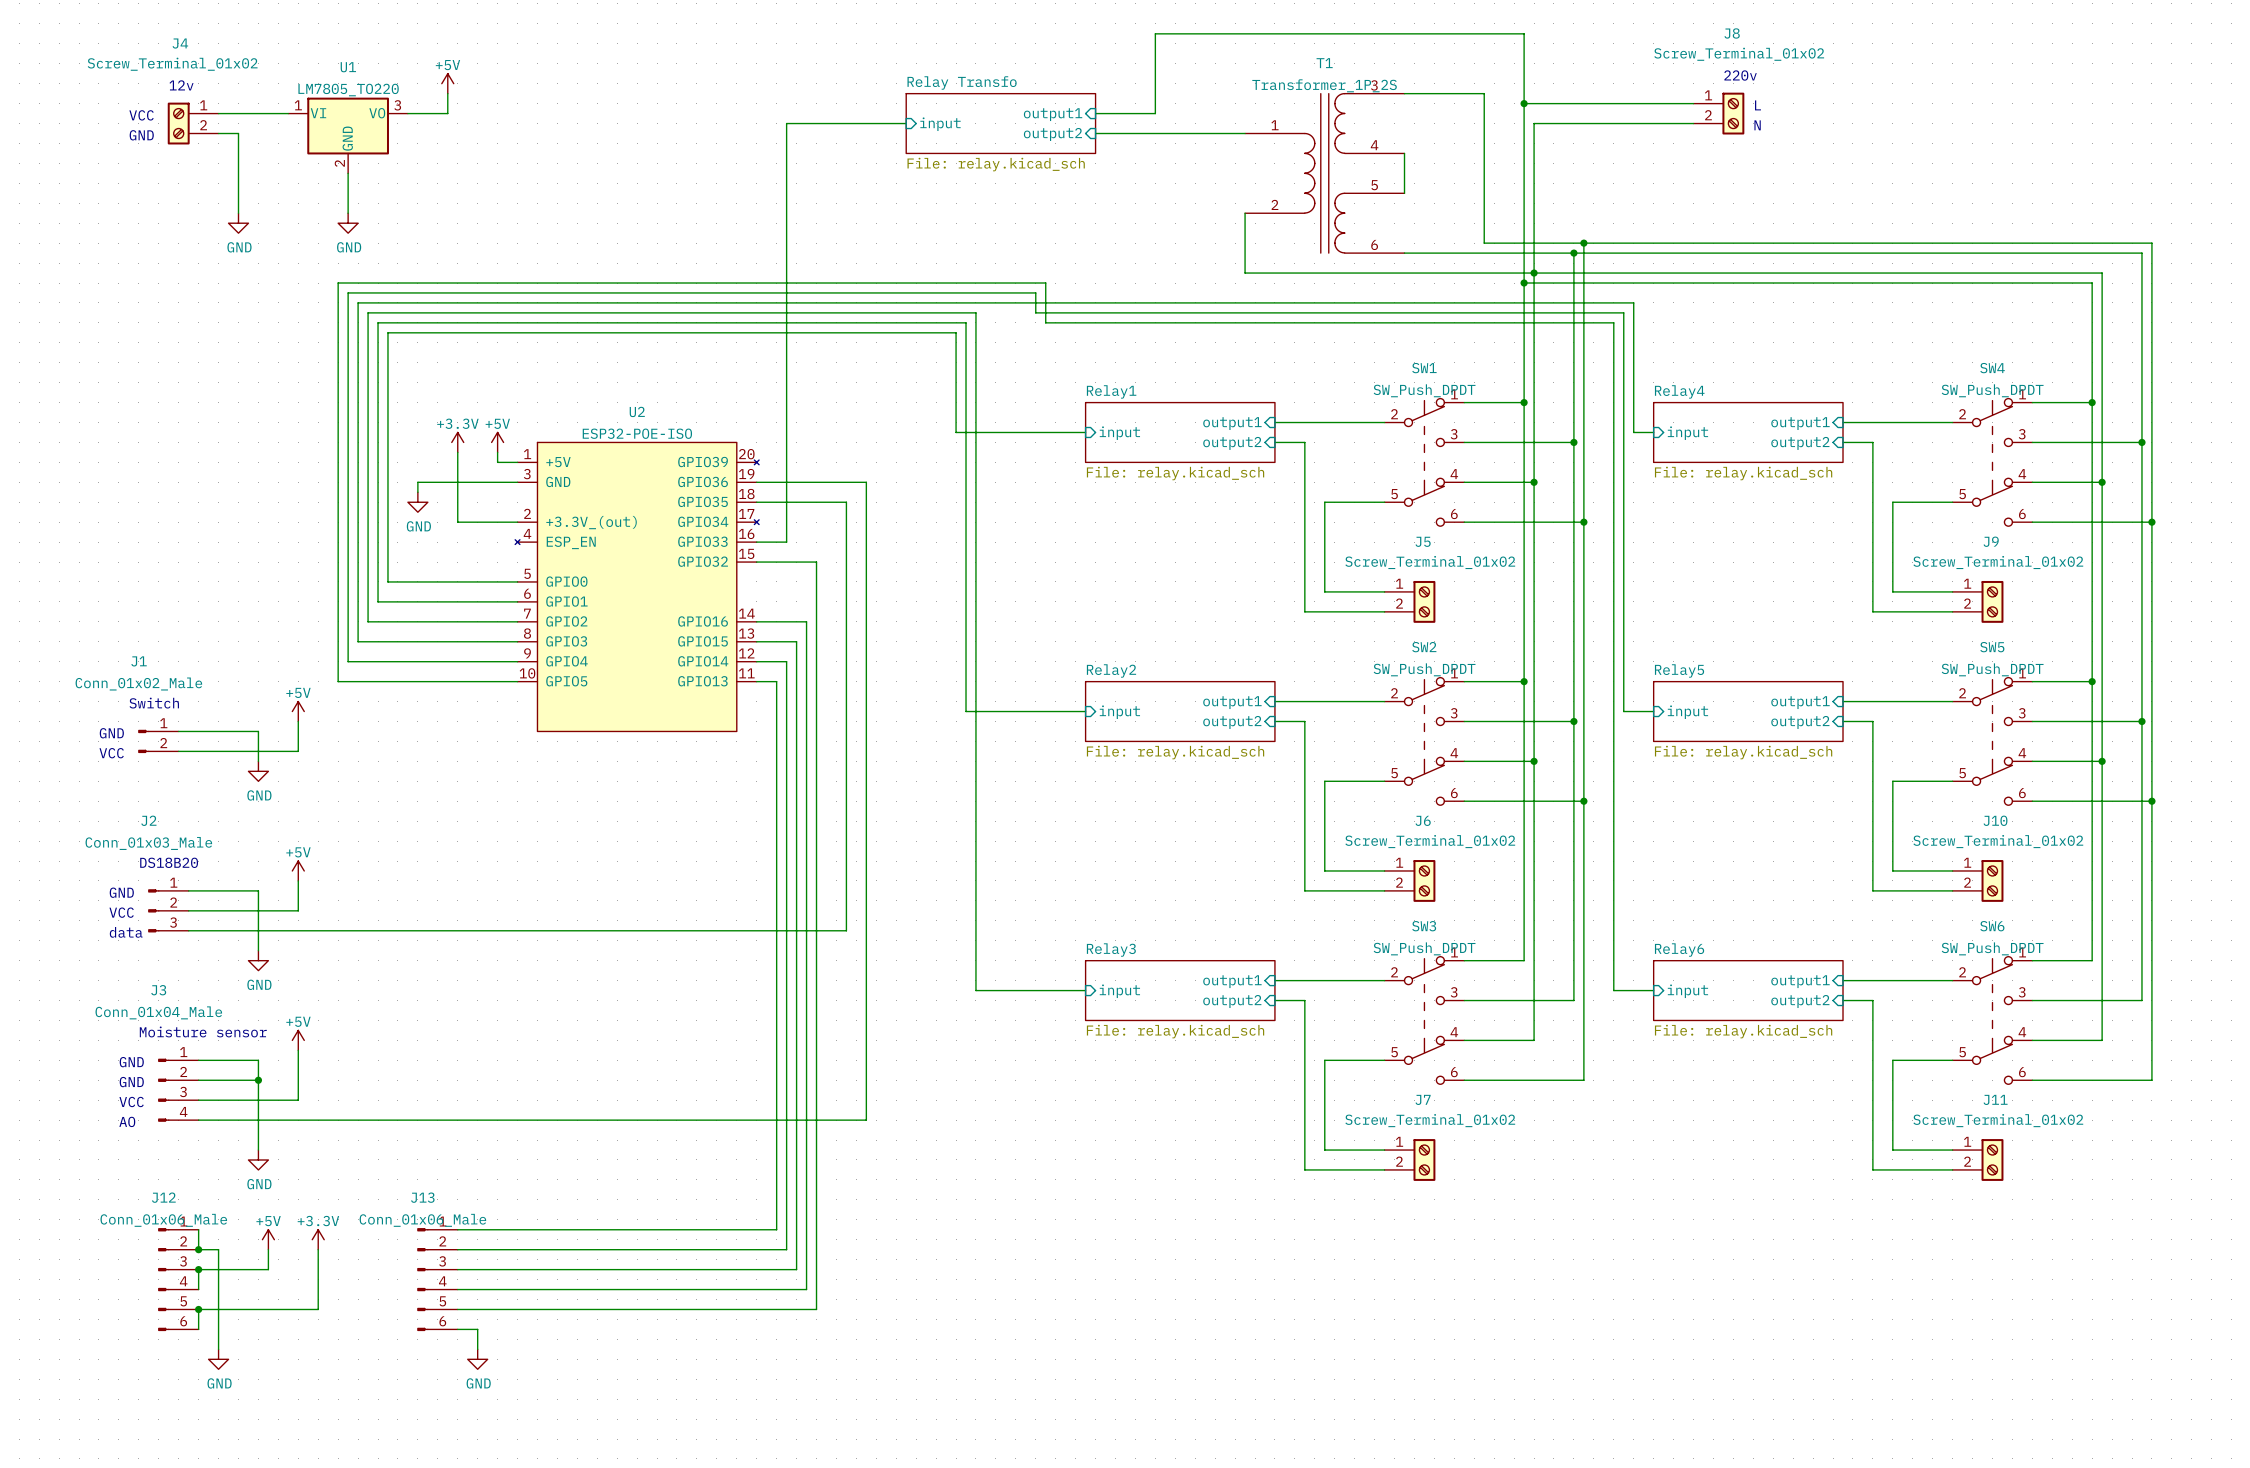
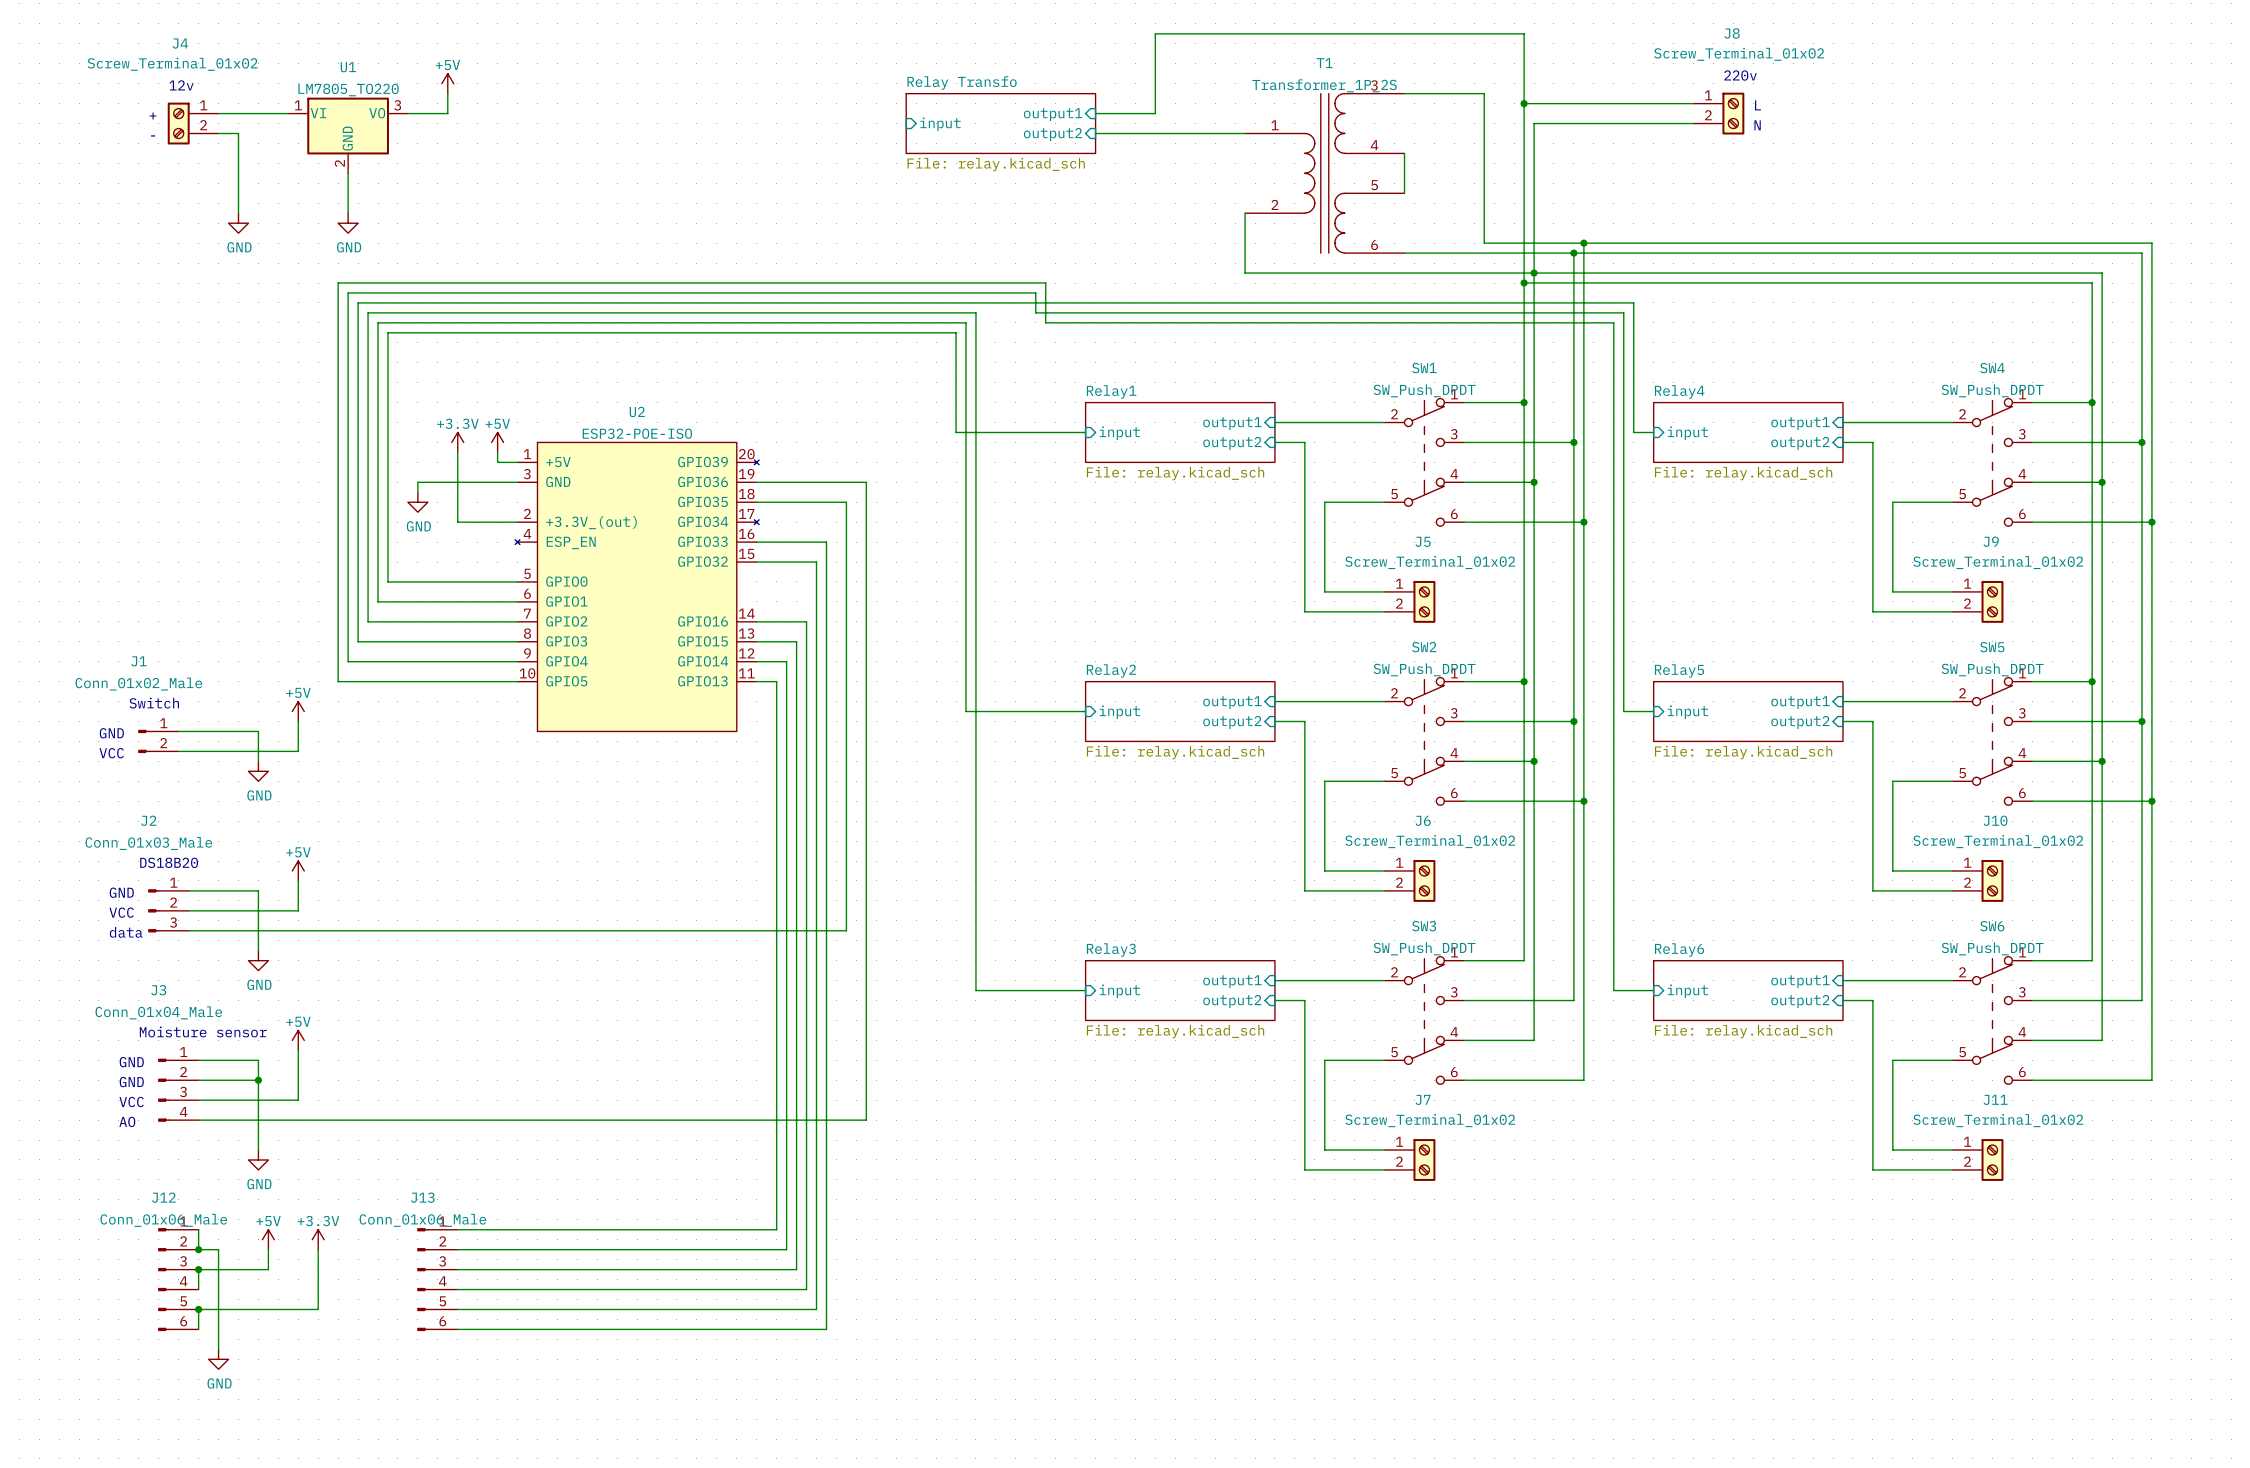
text: VCC (141, 115) -> none
text: none -> + (153, 116)
wire: (906, 123) (786, 123) (786, 542) -> none
text: GND (141, 135) -> none
text: none -> - (153, 135)
wire: (477, 1329) (477, 1349) -> (477, 1329) (826, 1329) (826, 542) (786, 542)
power symbol: GND (477, 1359) -> none

